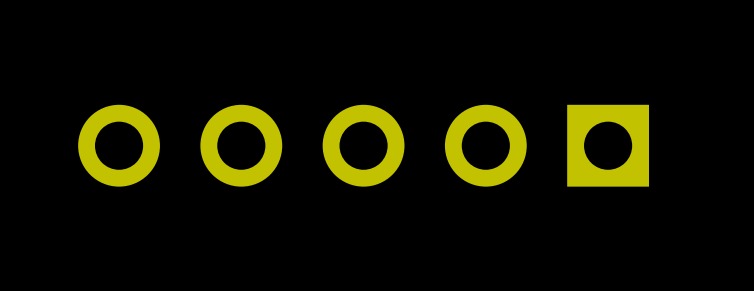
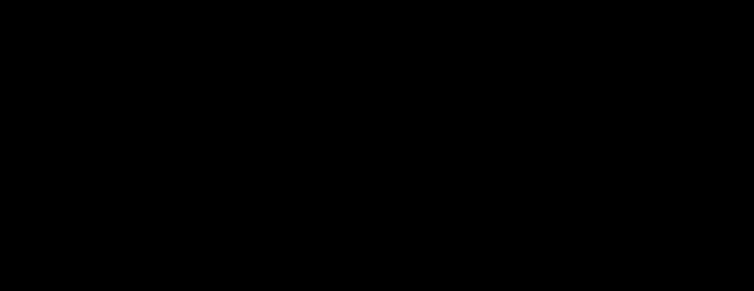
part: (363, 145) -> none

